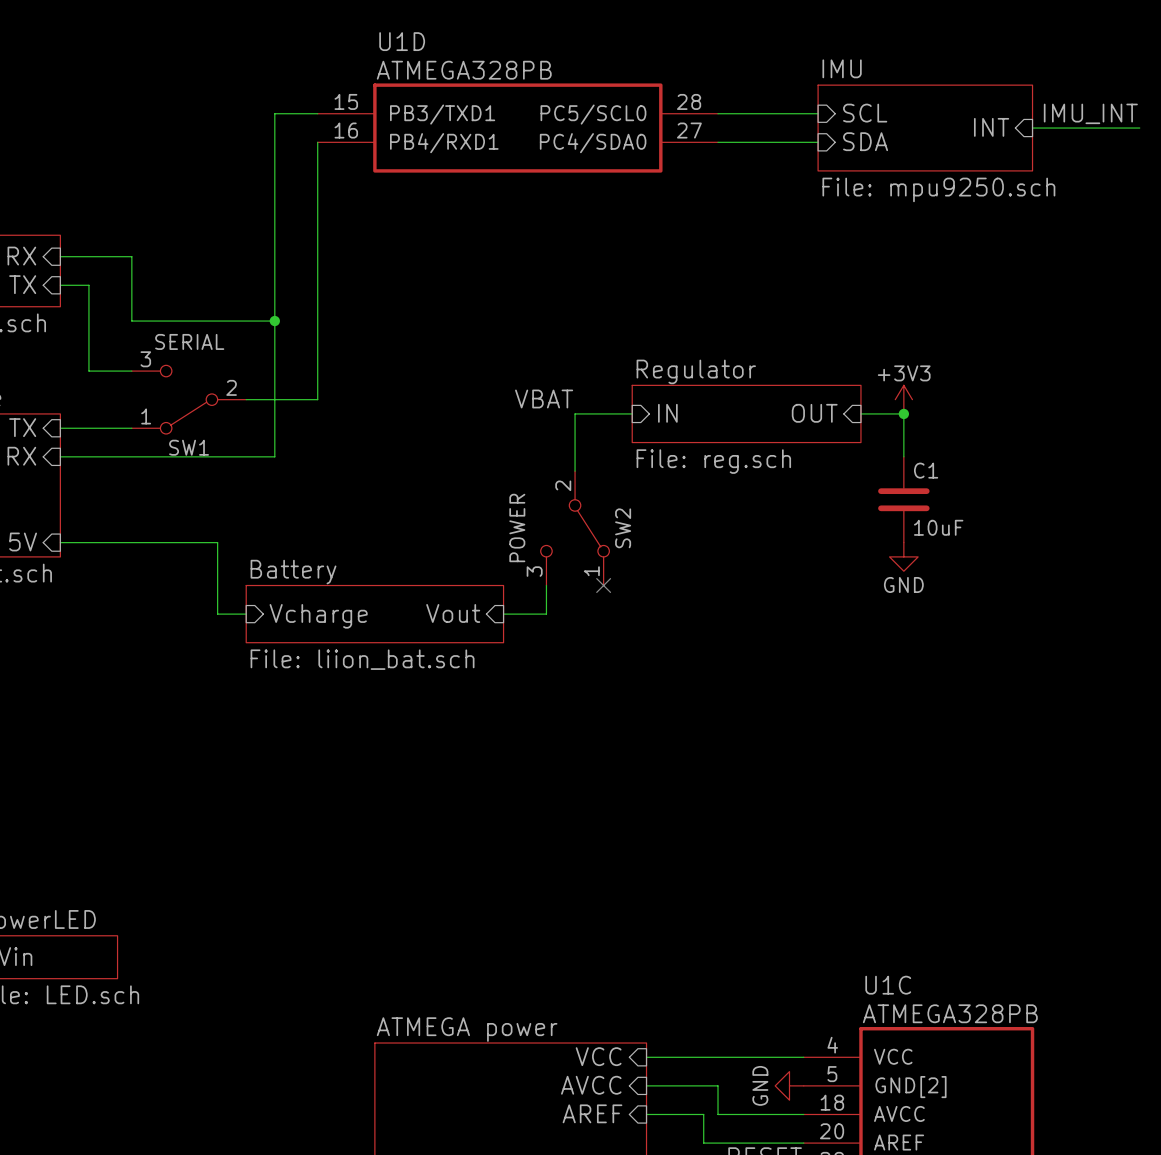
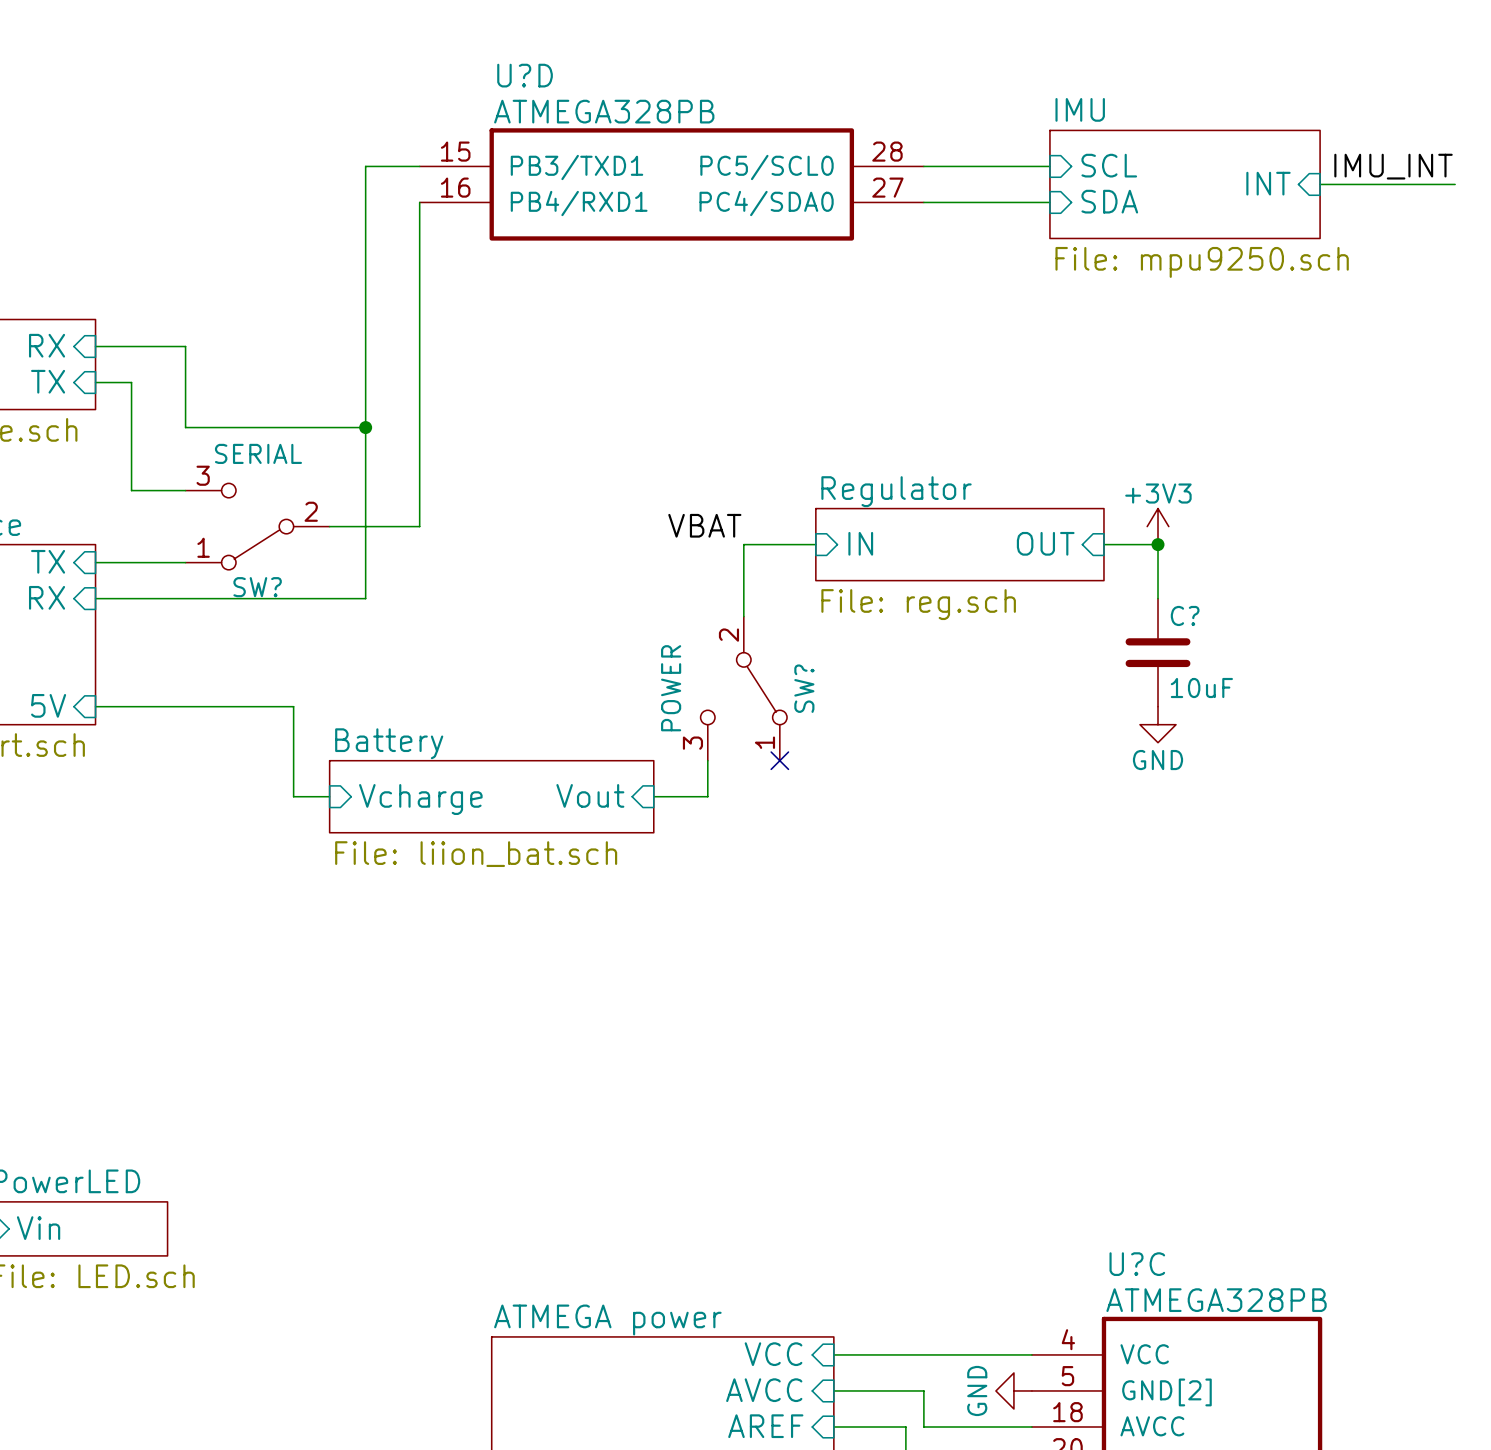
U1D name: U1D (402, 41) -> U?D (525, 75)
SW1 name: SW1 (189, 447) -> SW? (257, 587)
C1 name: C1 (926, 470) -> C? (1185, 615)
SW2 name: SW2 (623, 528) -> SW? (804, 688)
U1C name: U1C (888, 985) -> U?C (1137, 1264)

